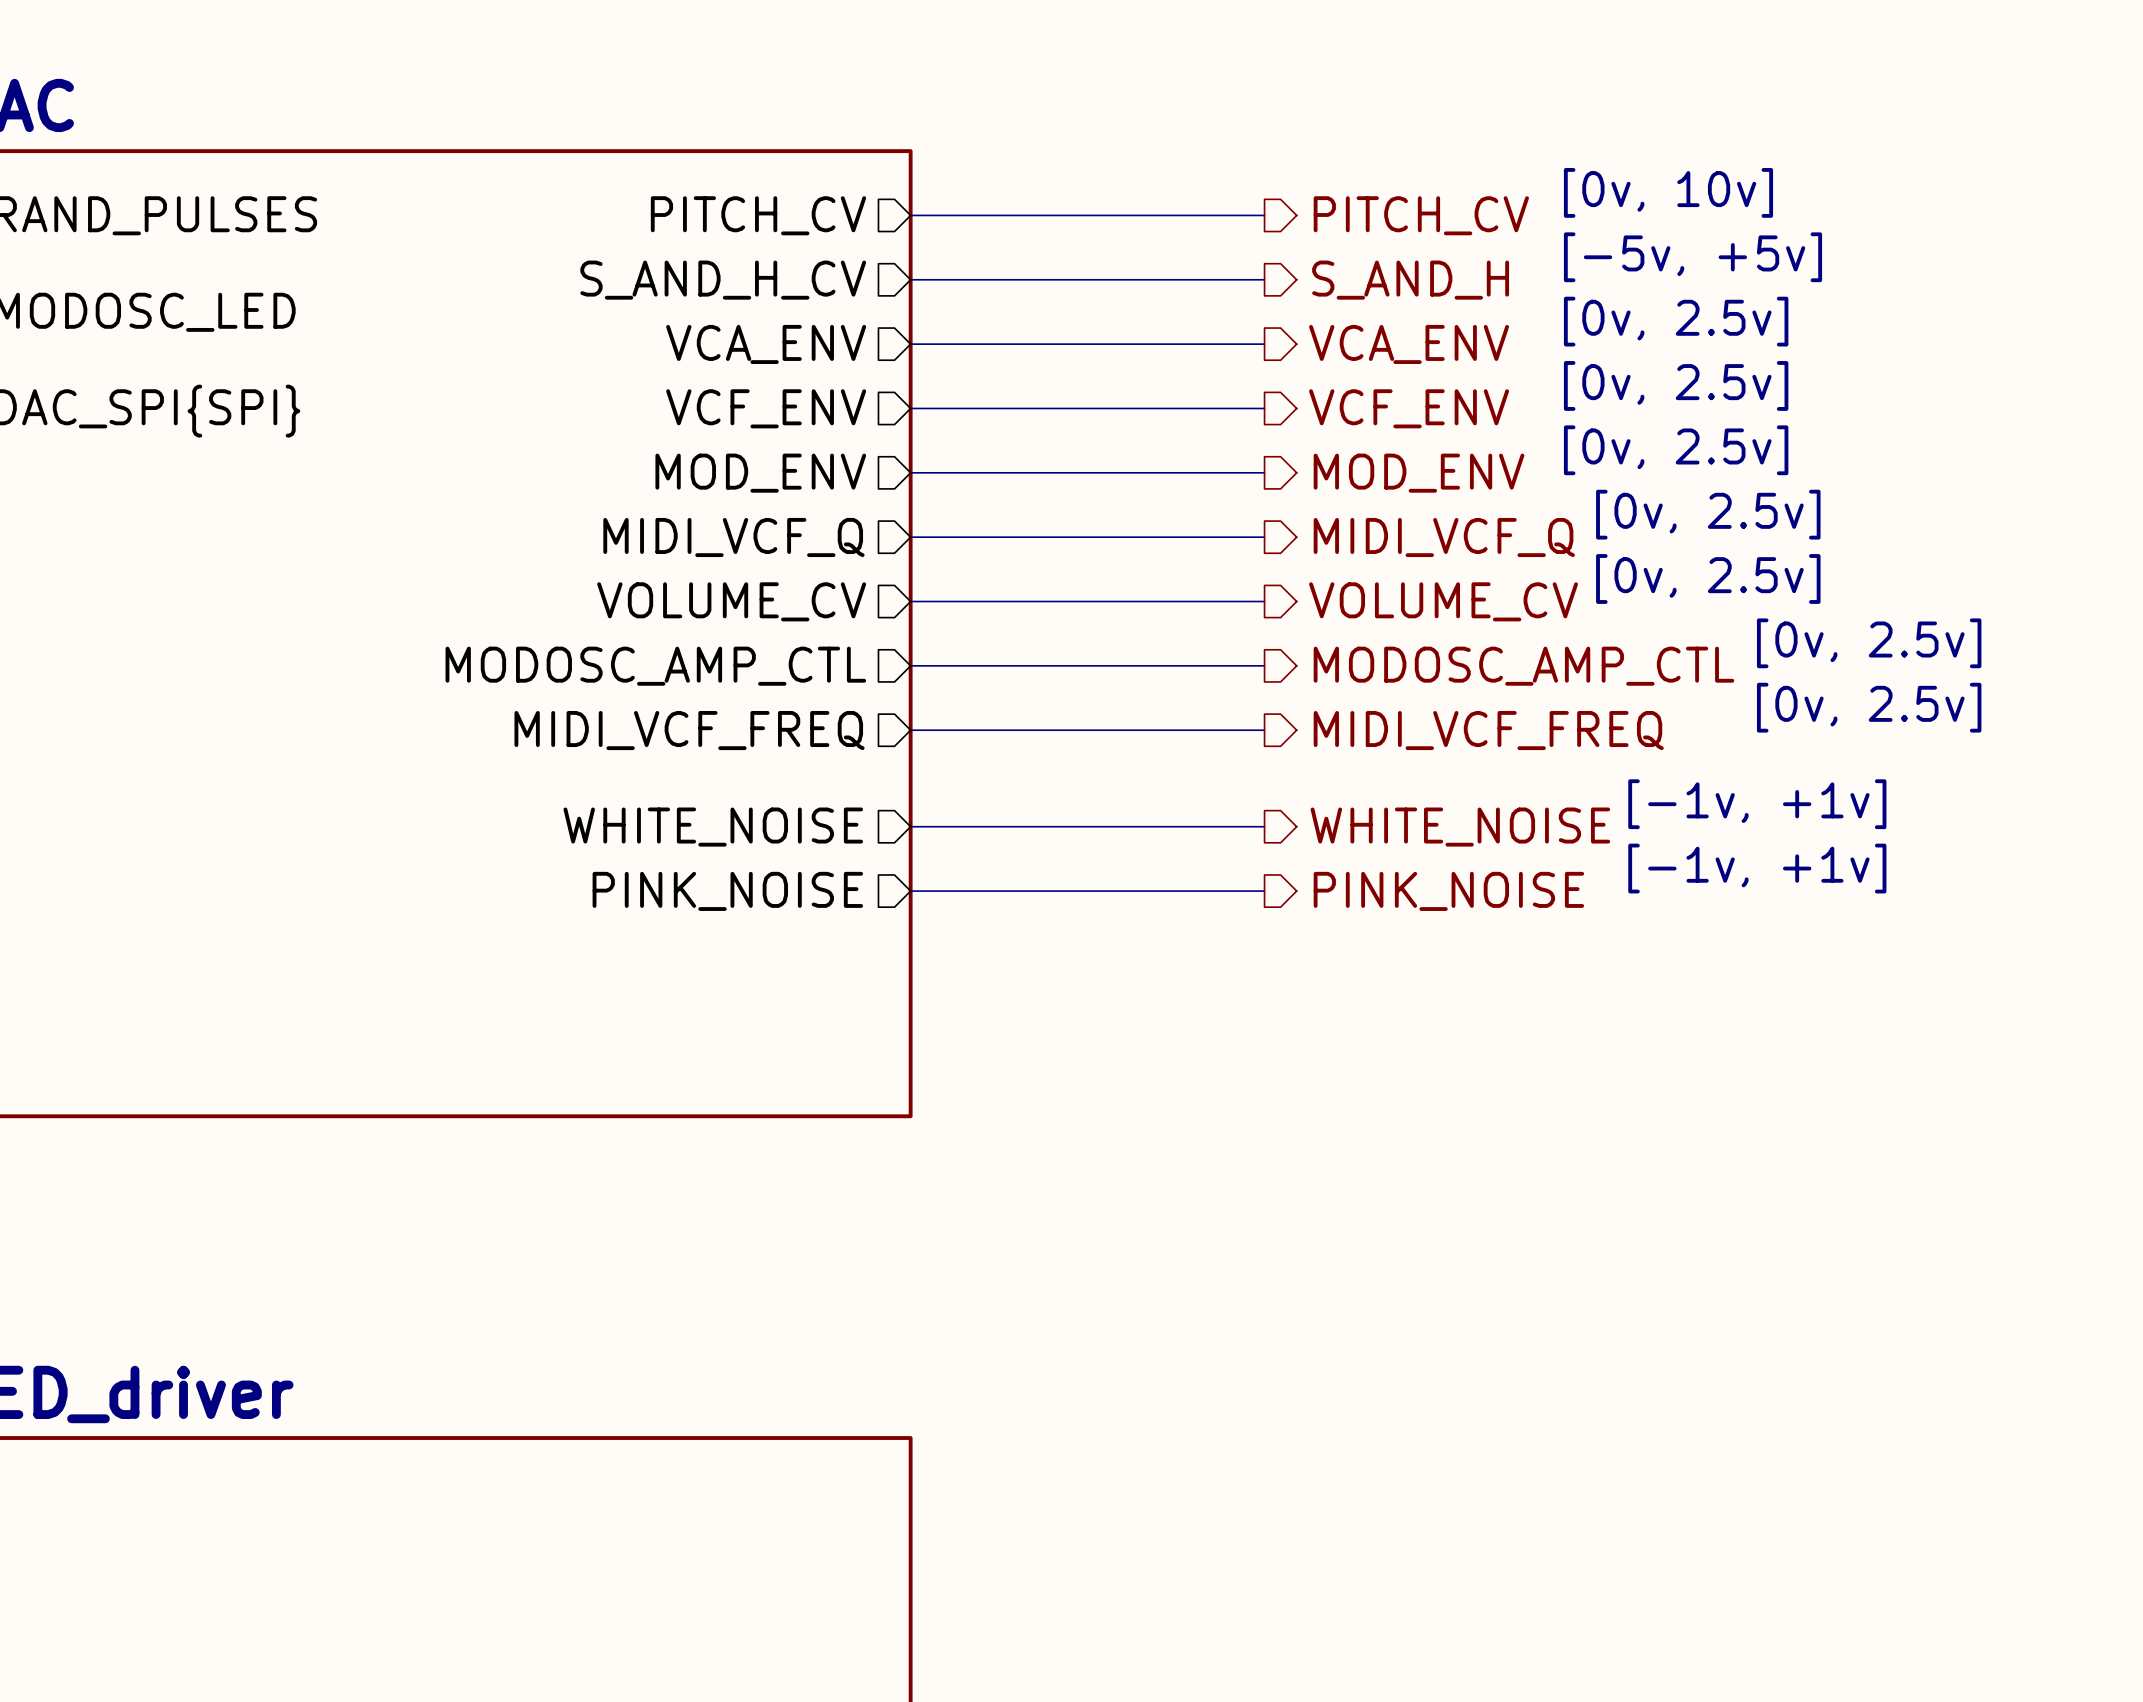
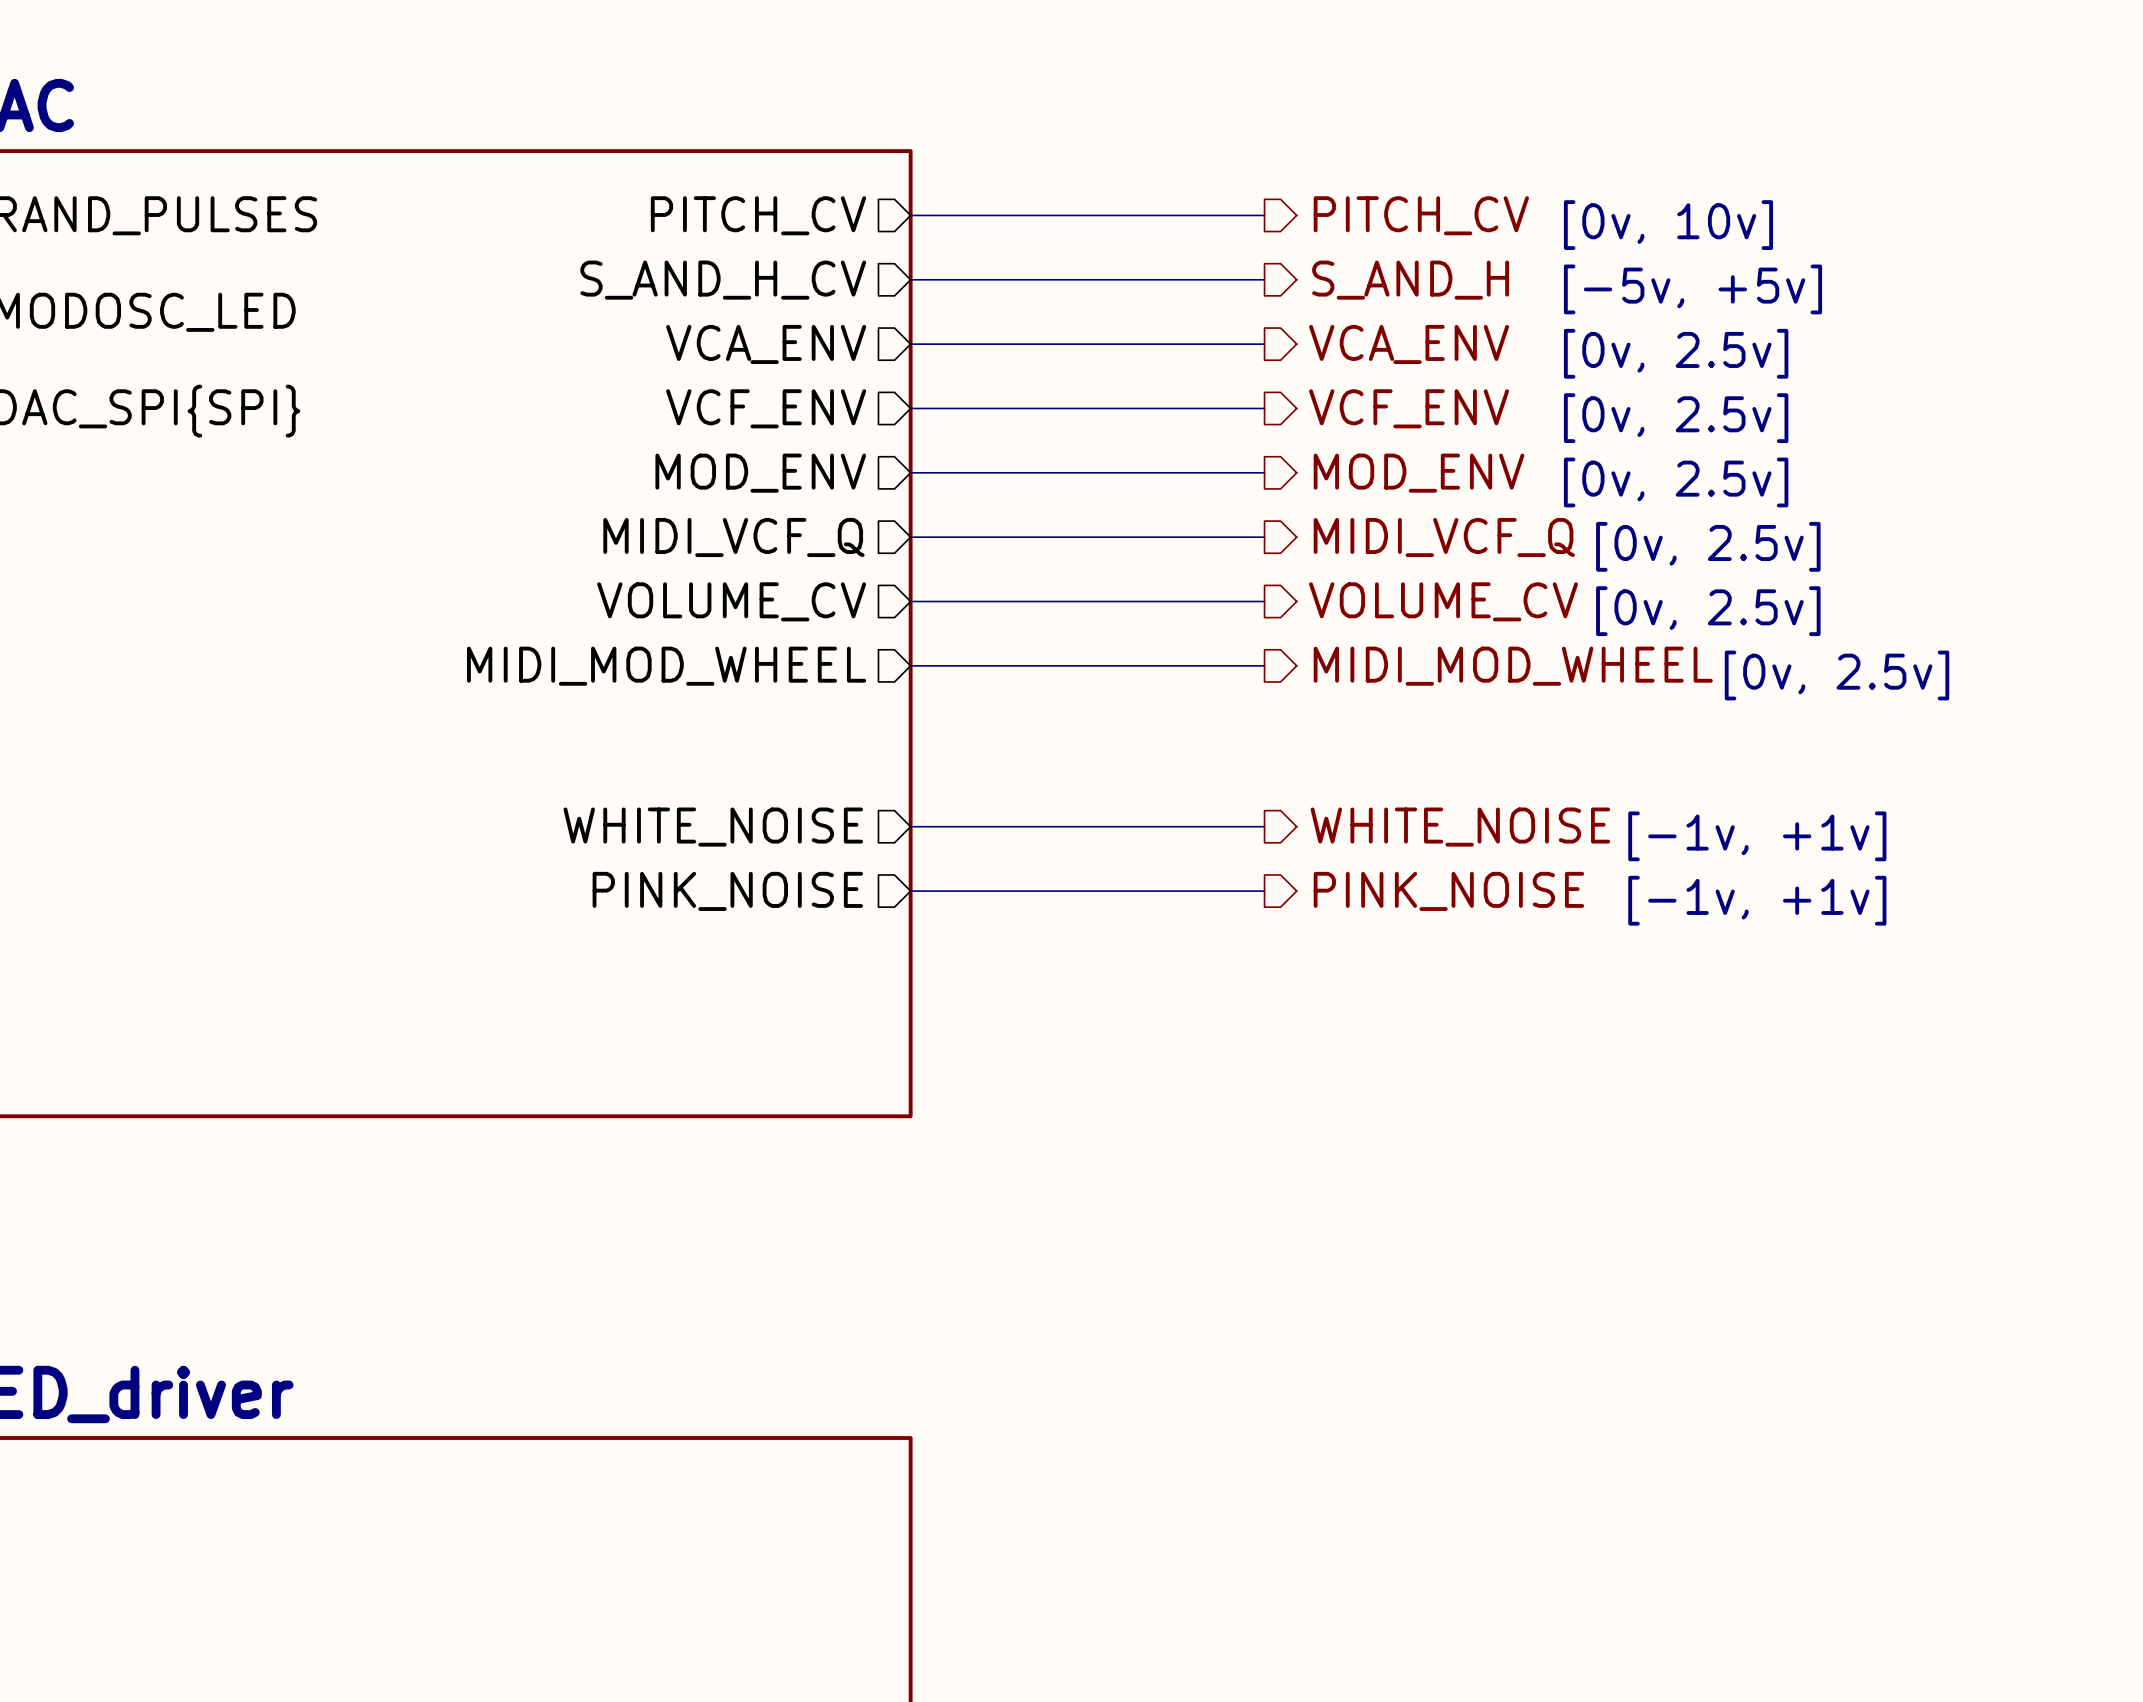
text position: [0v, 10v] (1668, 192) -> [0v, 10v] (1668, 225)
text position: [-5v, +5v] (1692, 257) -> [-5v, +5v] (1692, 289)
text: [0v, 2.5v] (1676, 321) -> none
text: none -> [0v, 2.5v] (1676, 353)
text: [0v, 2.5v] (1676, 385) -> none
text: none -> [0v, 2.5v] (1676, 418)
text: [0v, 2.5v] (1676, 450) -> none
text: none -> [0v, 2.5v] (1676, 482)
text: [0v, 2.5v] (1708, 514) -> none
text: none -> [0v, 2.5v] (1708, 546)
text: [0v, 2.5v] (1708, 578) -> none
text: none -> [0v, 2.5v] (1708, 611)
text: [0v, 2.5v] (1869, 643) -> none
sheet pin: MODOSC_AMP_CTL (655, 666) -> MIDI_MOD_WHEEL (666, 666)
hierarchical label: MODOSC_AMP_CTL (1523, 666) -> MIDI_MOD_WHEEL (1513, 666)
text: none -> [0v, 2.5v] (1837, 675)
text: [0v, 2.5v] (1869, 707) -> none
sheet pin: MIDI_VCF_FREQ (689, 730) -> none
wire: (910, 730) (1264, 730) -> none
hierarchical label: MIDI_VCF_FREQ (1488, 730) -> none
text: [-1v, +1v] (1757, 804) -> none
text: none -> [-1v, +1v] (1757, 836)
text: [-1v, +1v] (1757, 868) -> none
text: none -> [-1v, +1v] (1757, 900)

